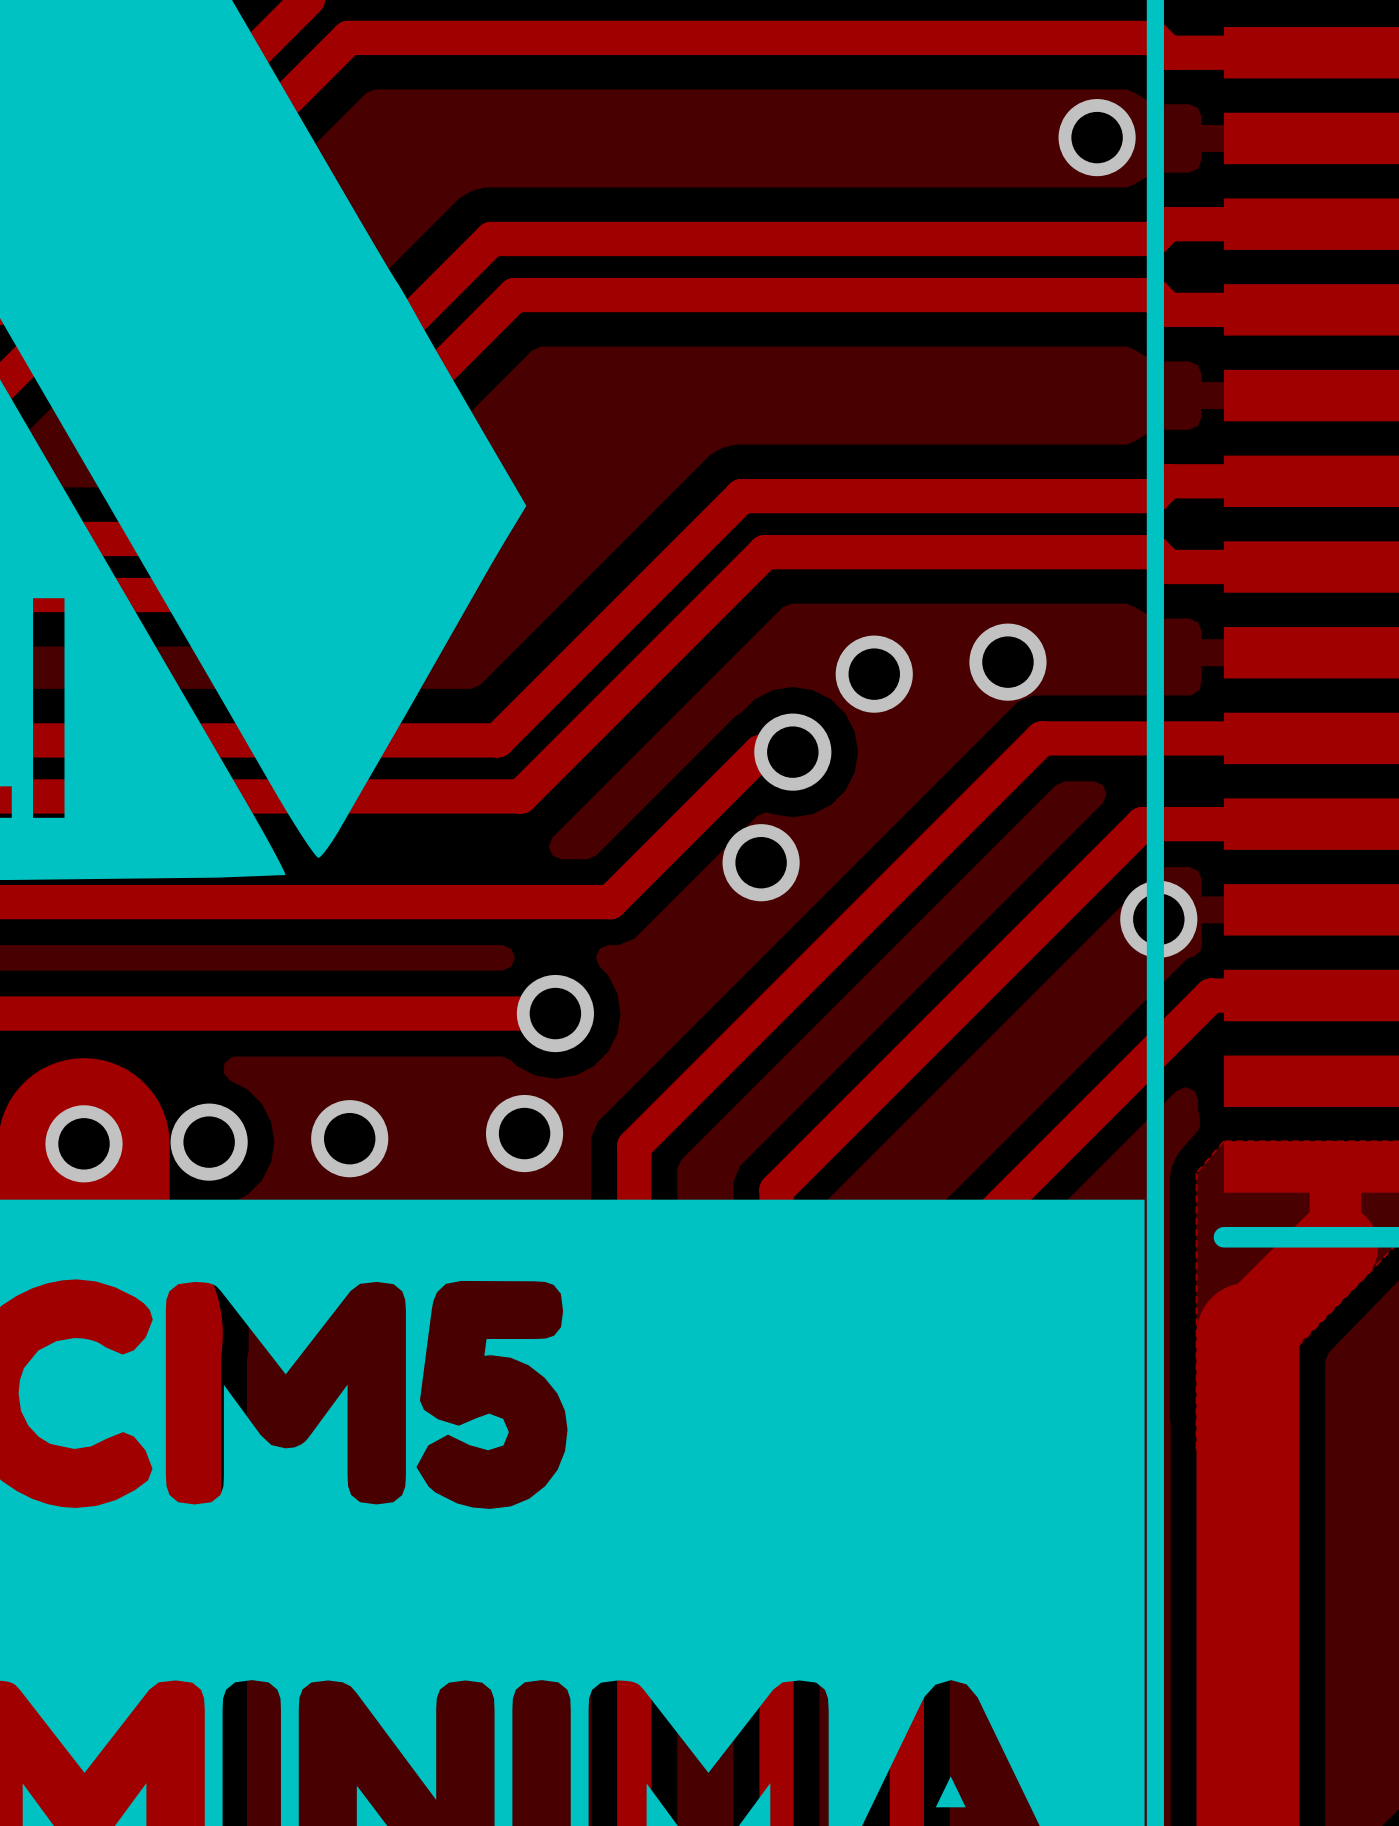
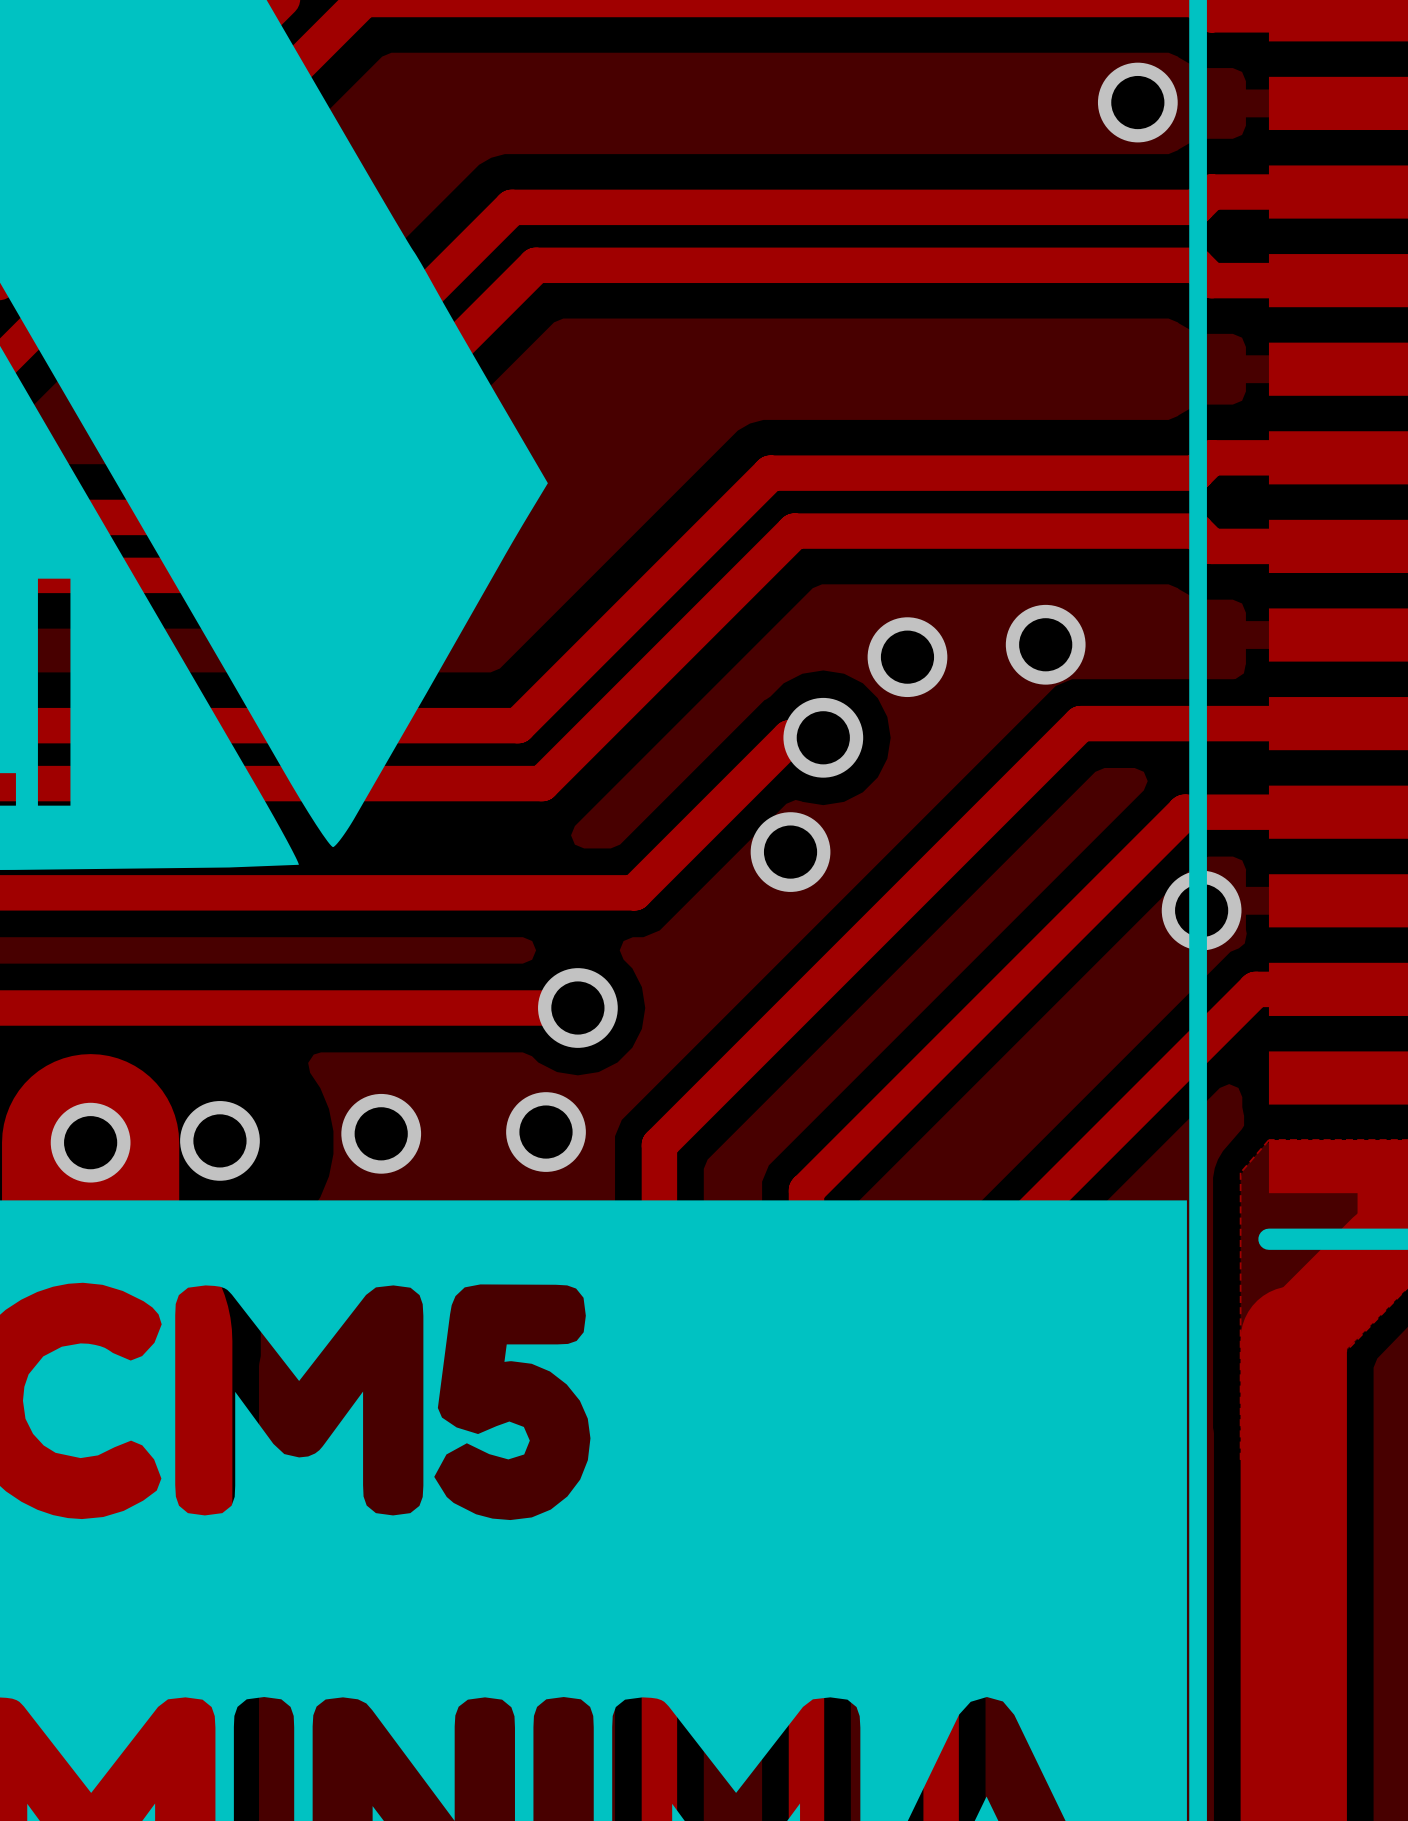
via position: (349, 1138) -> (381, 1133)

